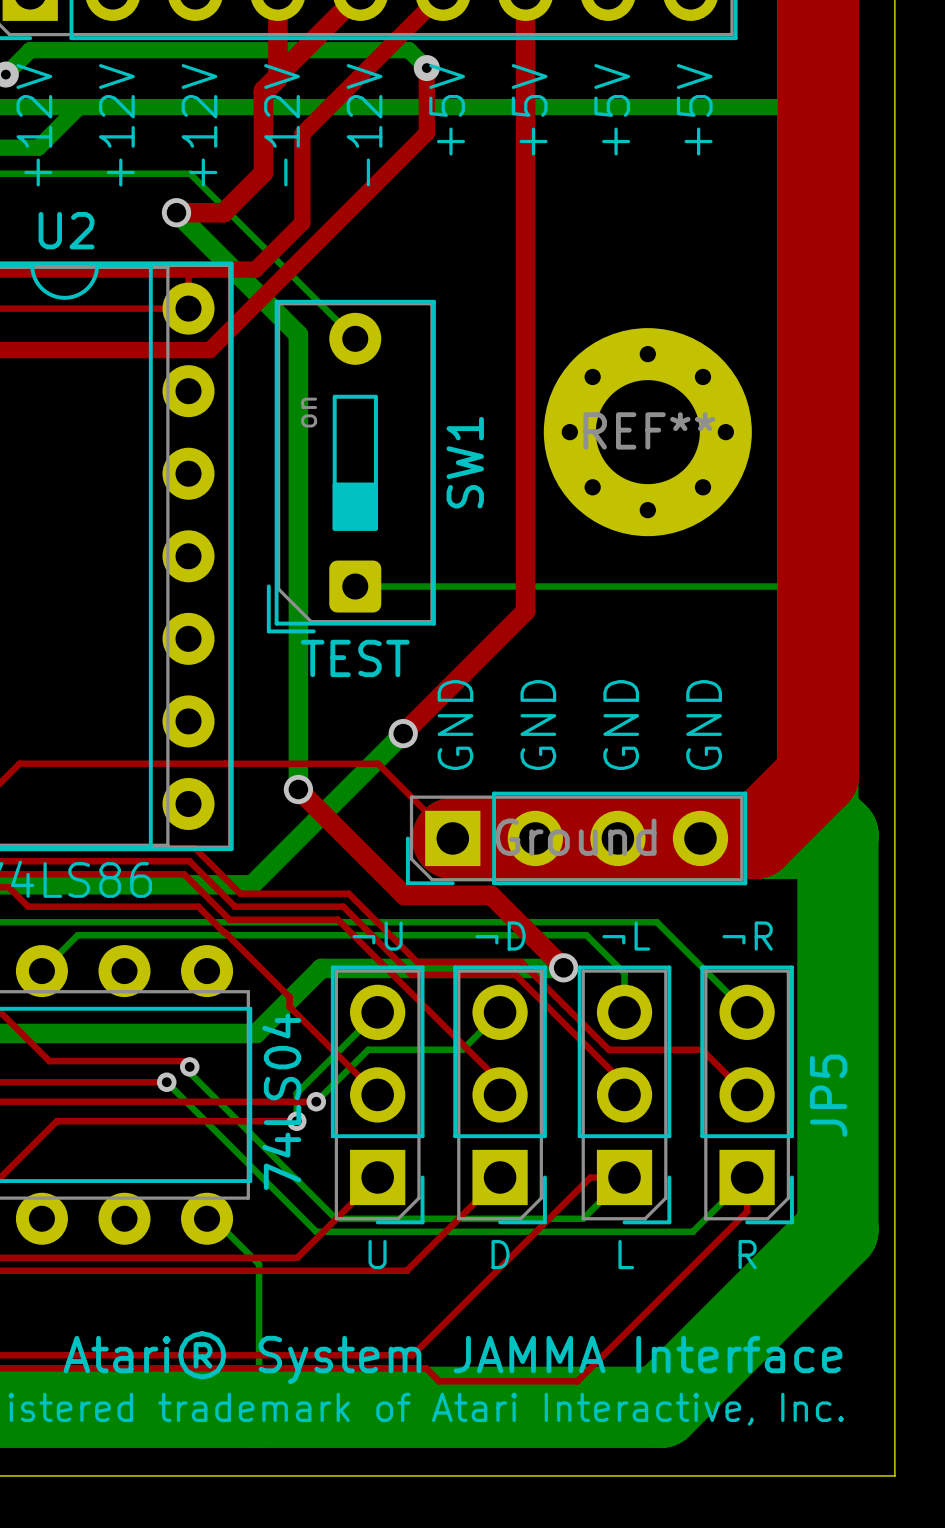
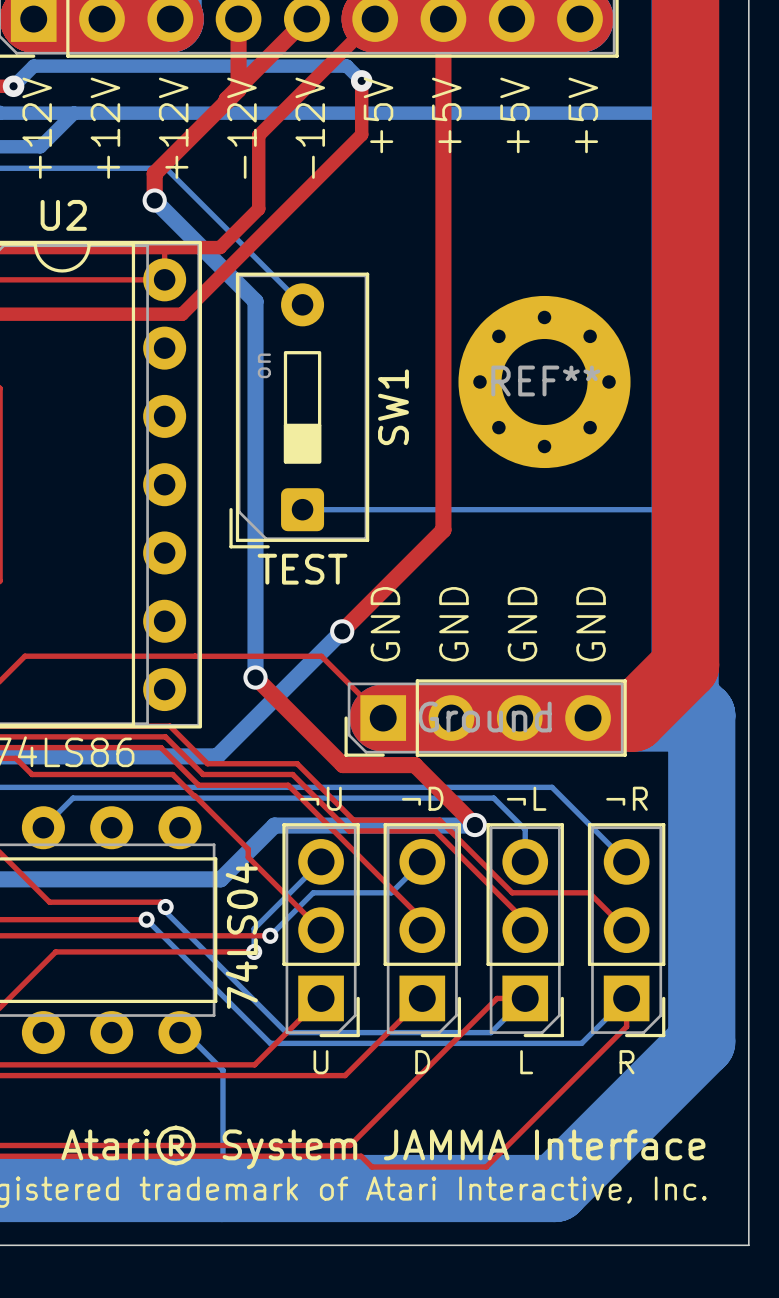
top track: (263, 93) (263, 172) (223, 212) (176, 212) -> (226, 101) (154, 173) (154, 200)
text: JP5 (828, 1095) -> none

